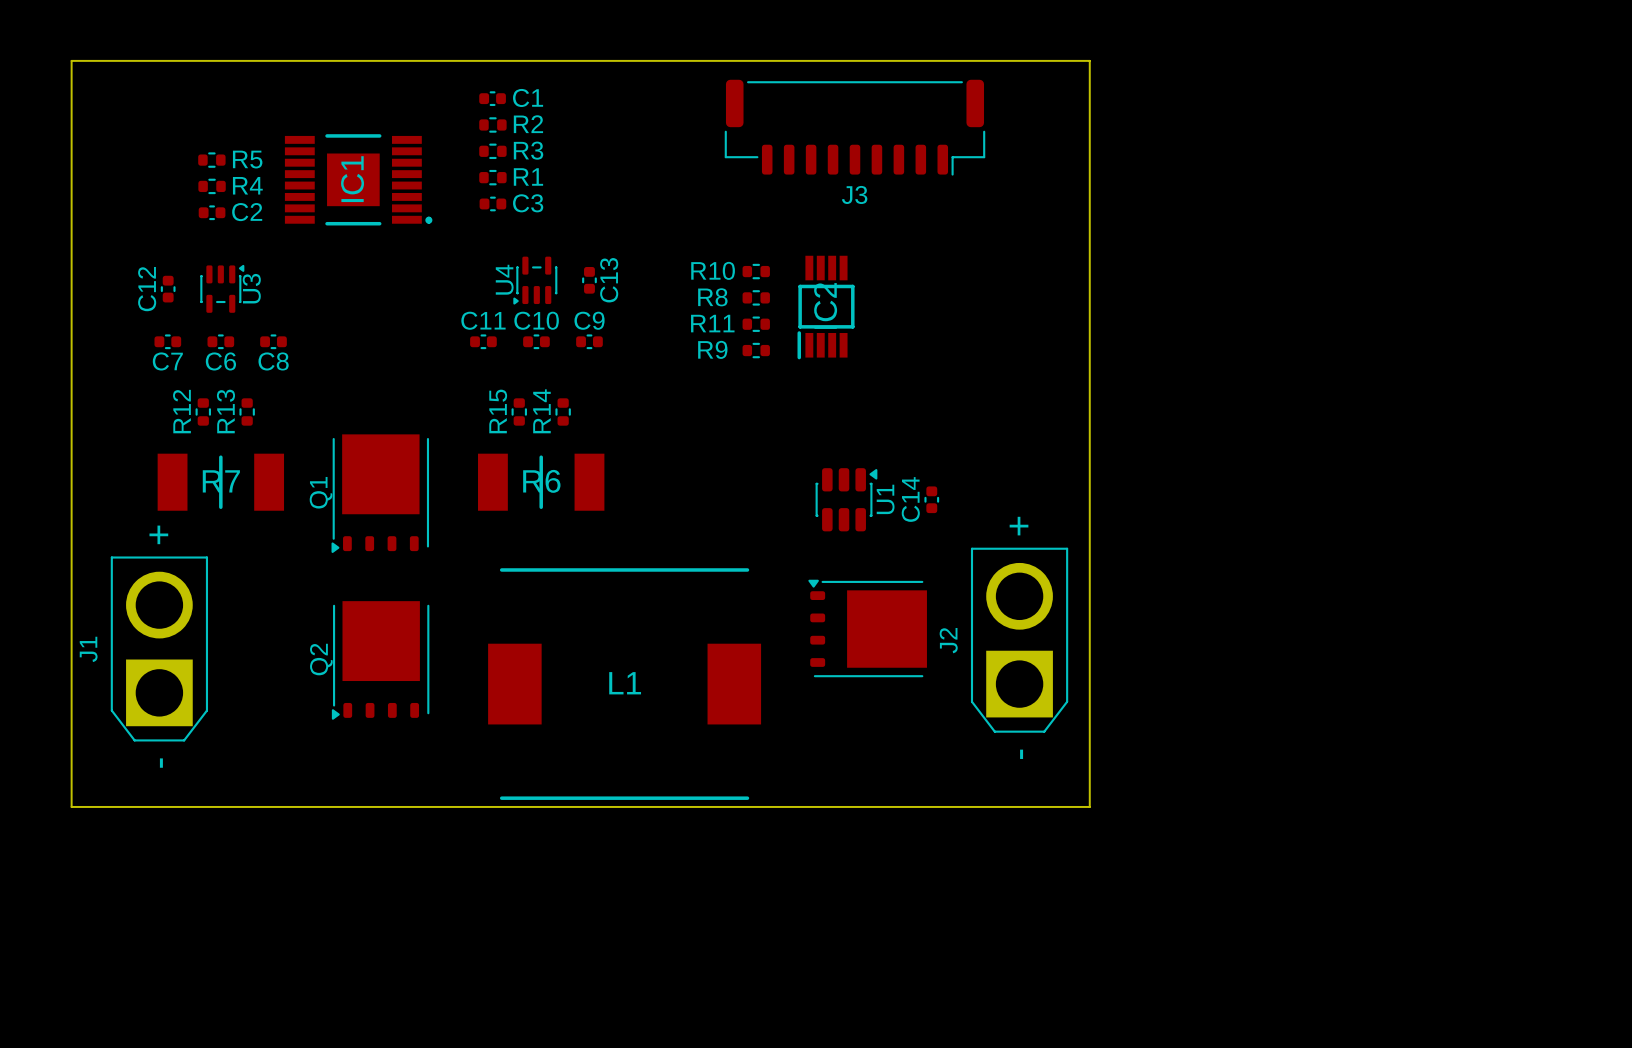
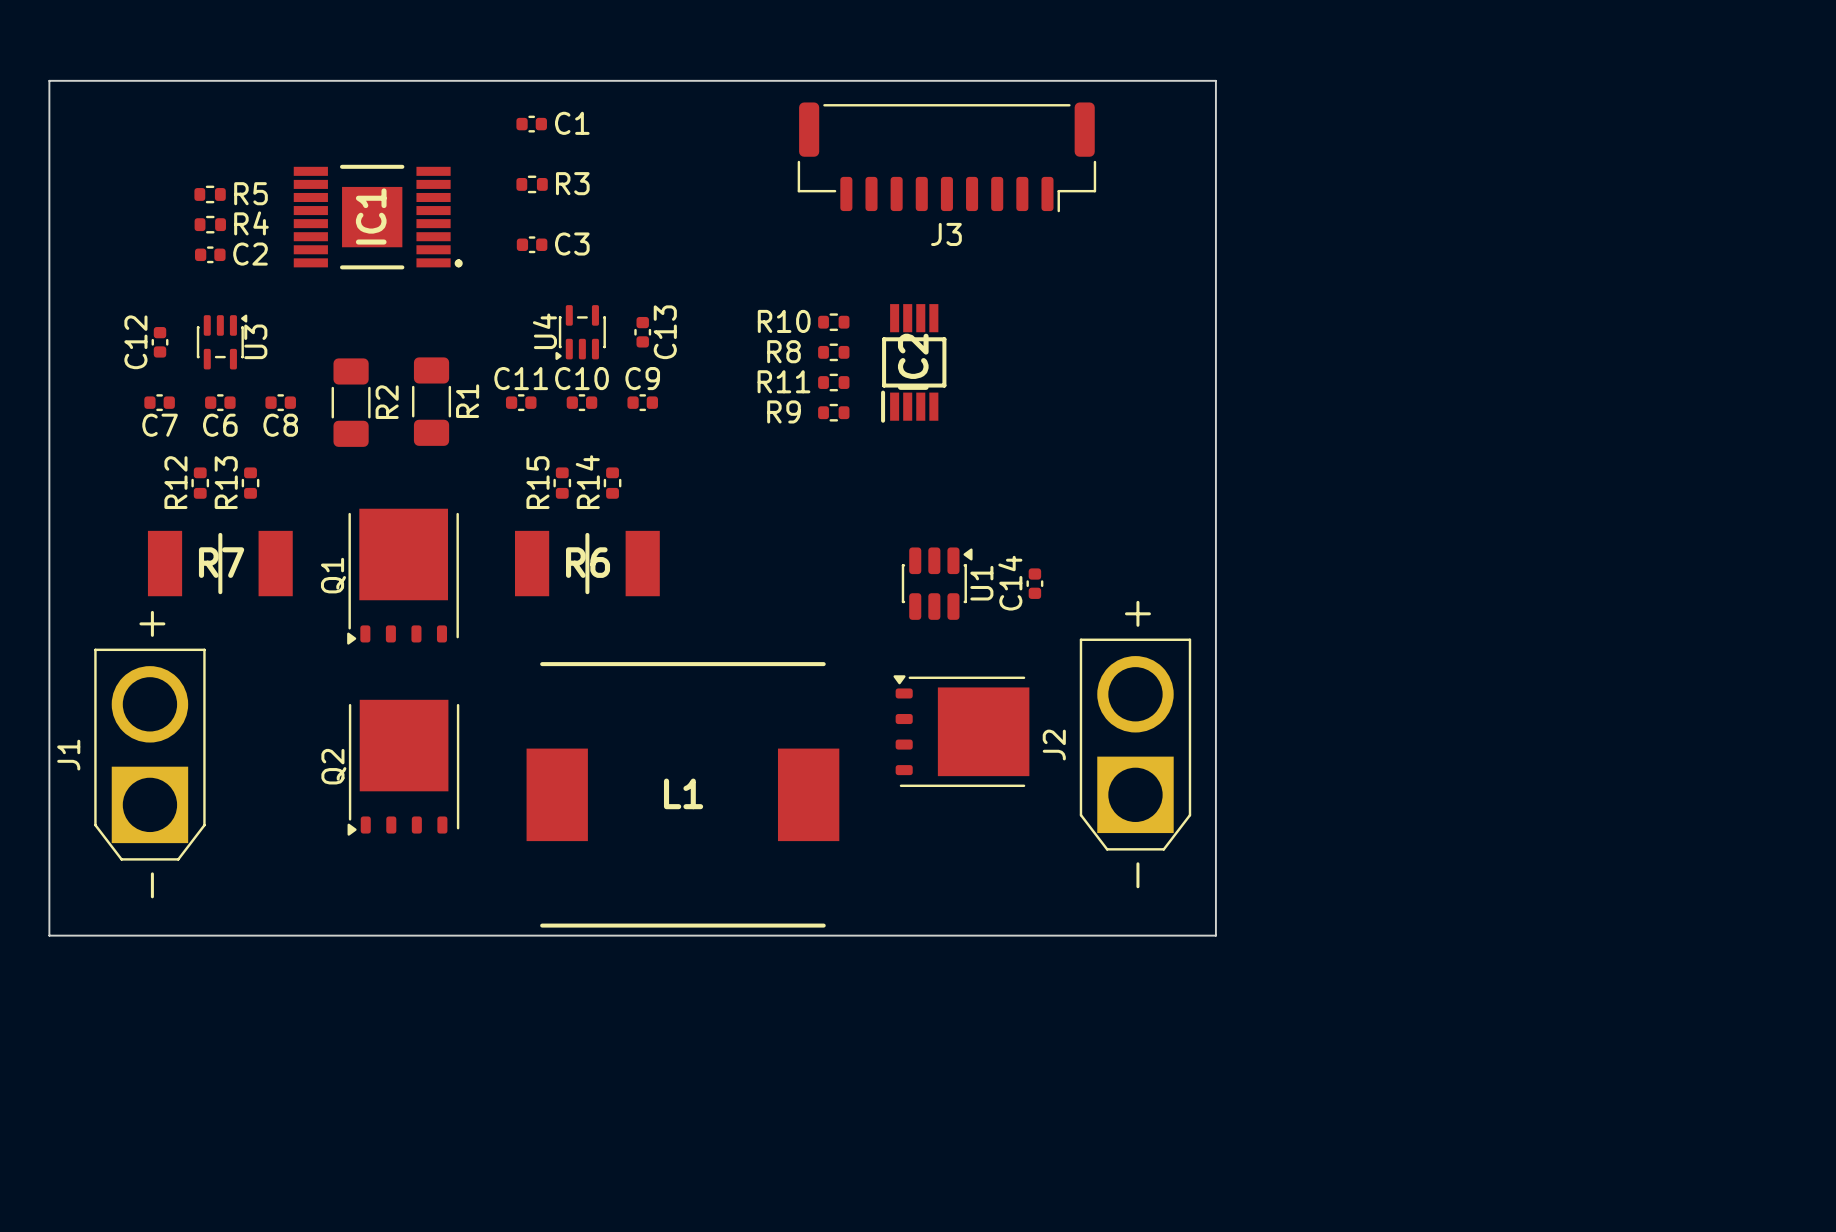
R2 footprint: [479, 117, 507, 133] -> [331, 358, 371, 447]
R1 footprint: [479, 169, 507, 186] -> [412, 357, 452, 446]

